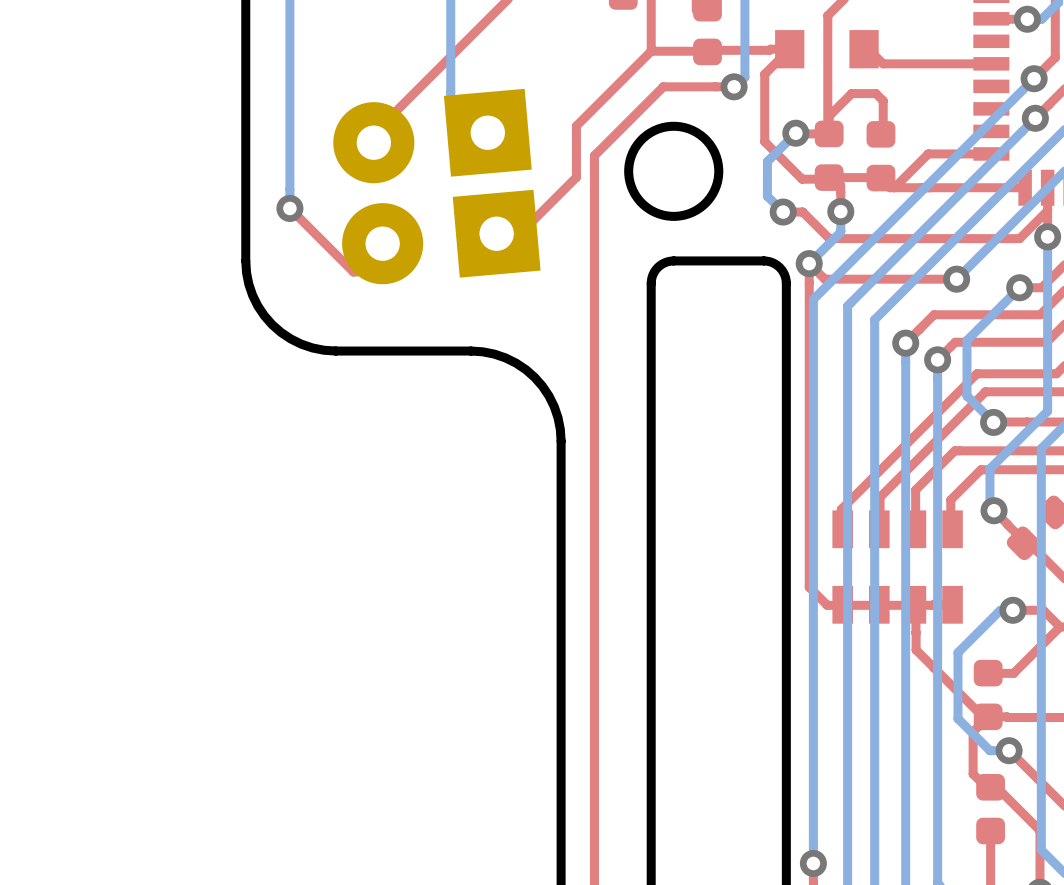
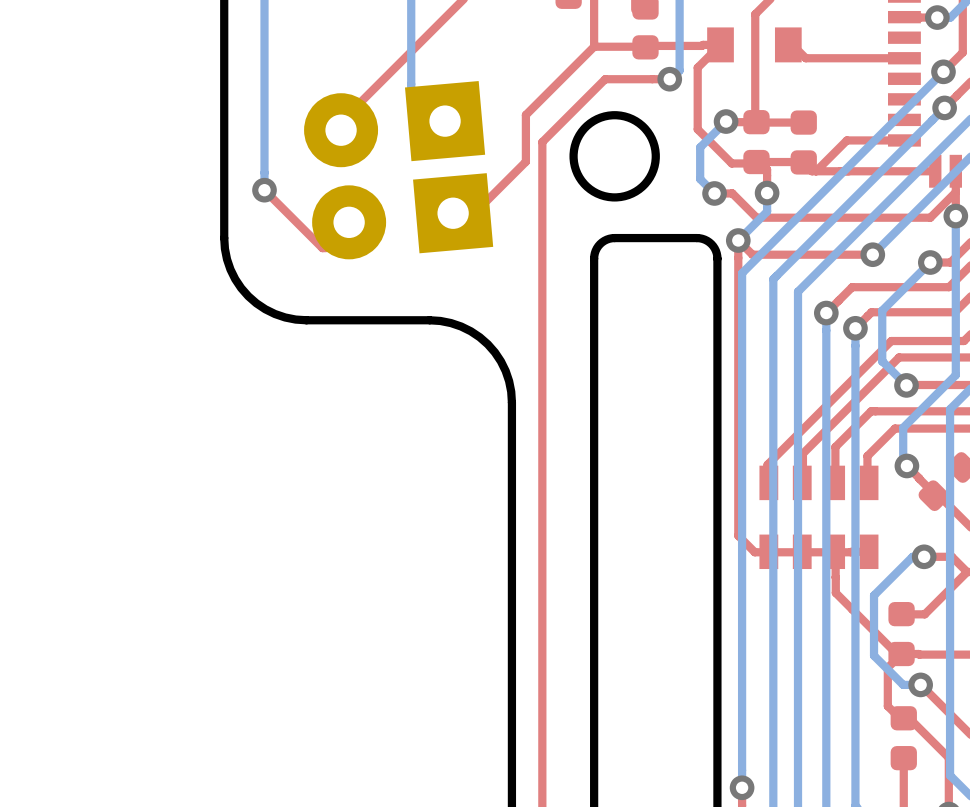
top track: (883, 130) (883, 100) (876, 93) (851, 93) (829, 116) (829, 133) -> (803, 122) (757, 122)

